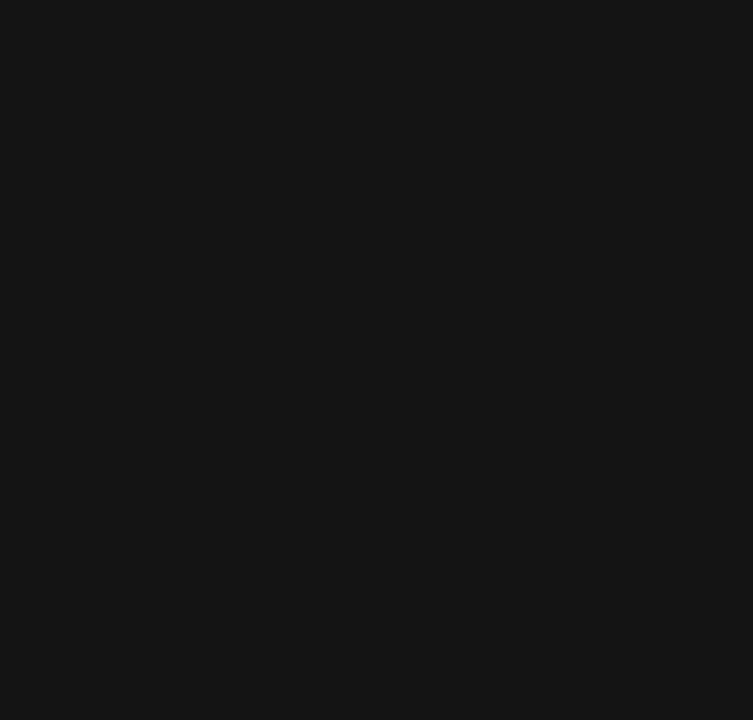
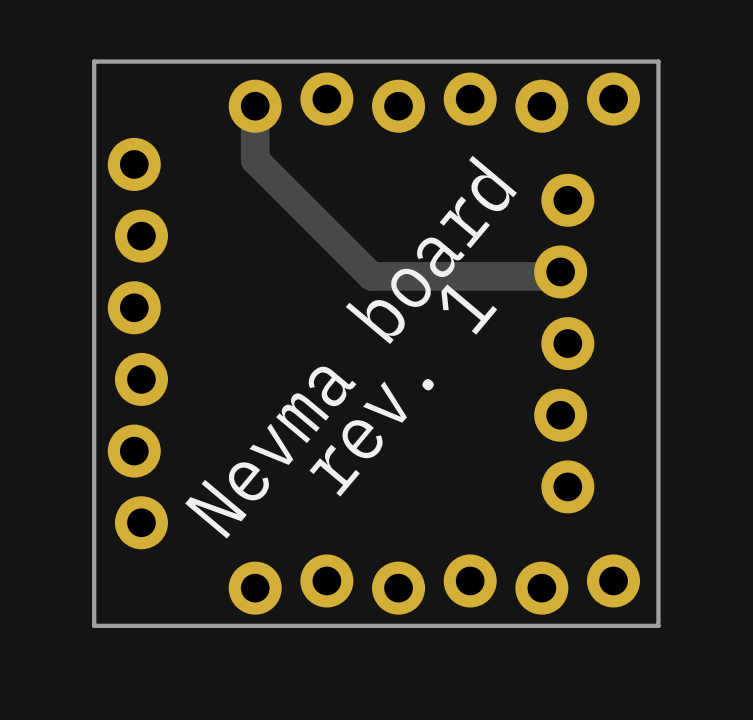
board edge: none -> (658, 61) (94, 61) (94, 625) (658, 625) (658, 61)
part: none -> (434, 102)
track: none -> (255, 106) (255, 159) (371, 276) (556, 276) (560, 271)
part: none -> (137, 343)
part: none -> (564, 343)
text: none -> Nevma board (351, 347)
text: none -> rev. 1 (403, 390)
part: none -> (434, 584)

